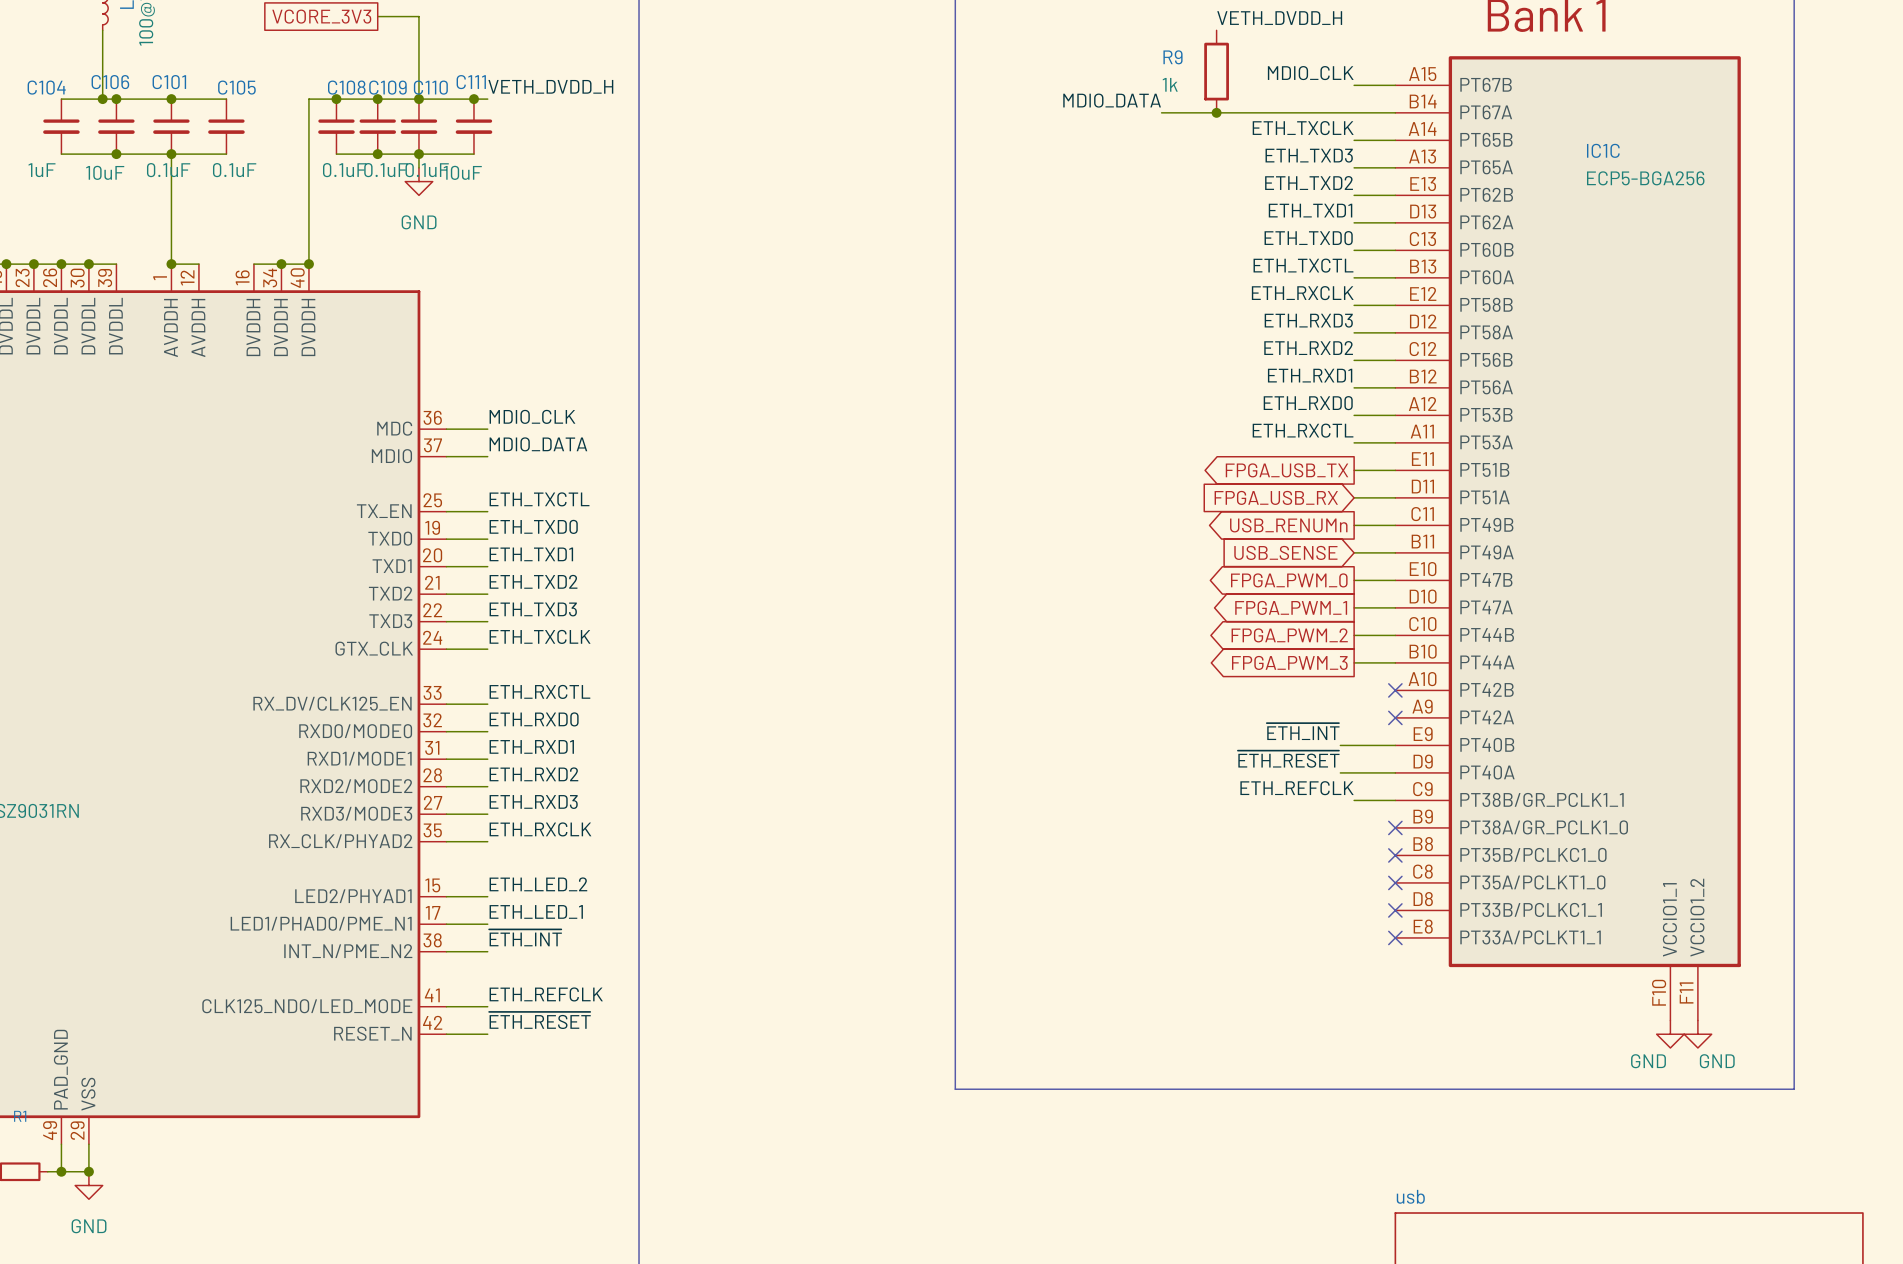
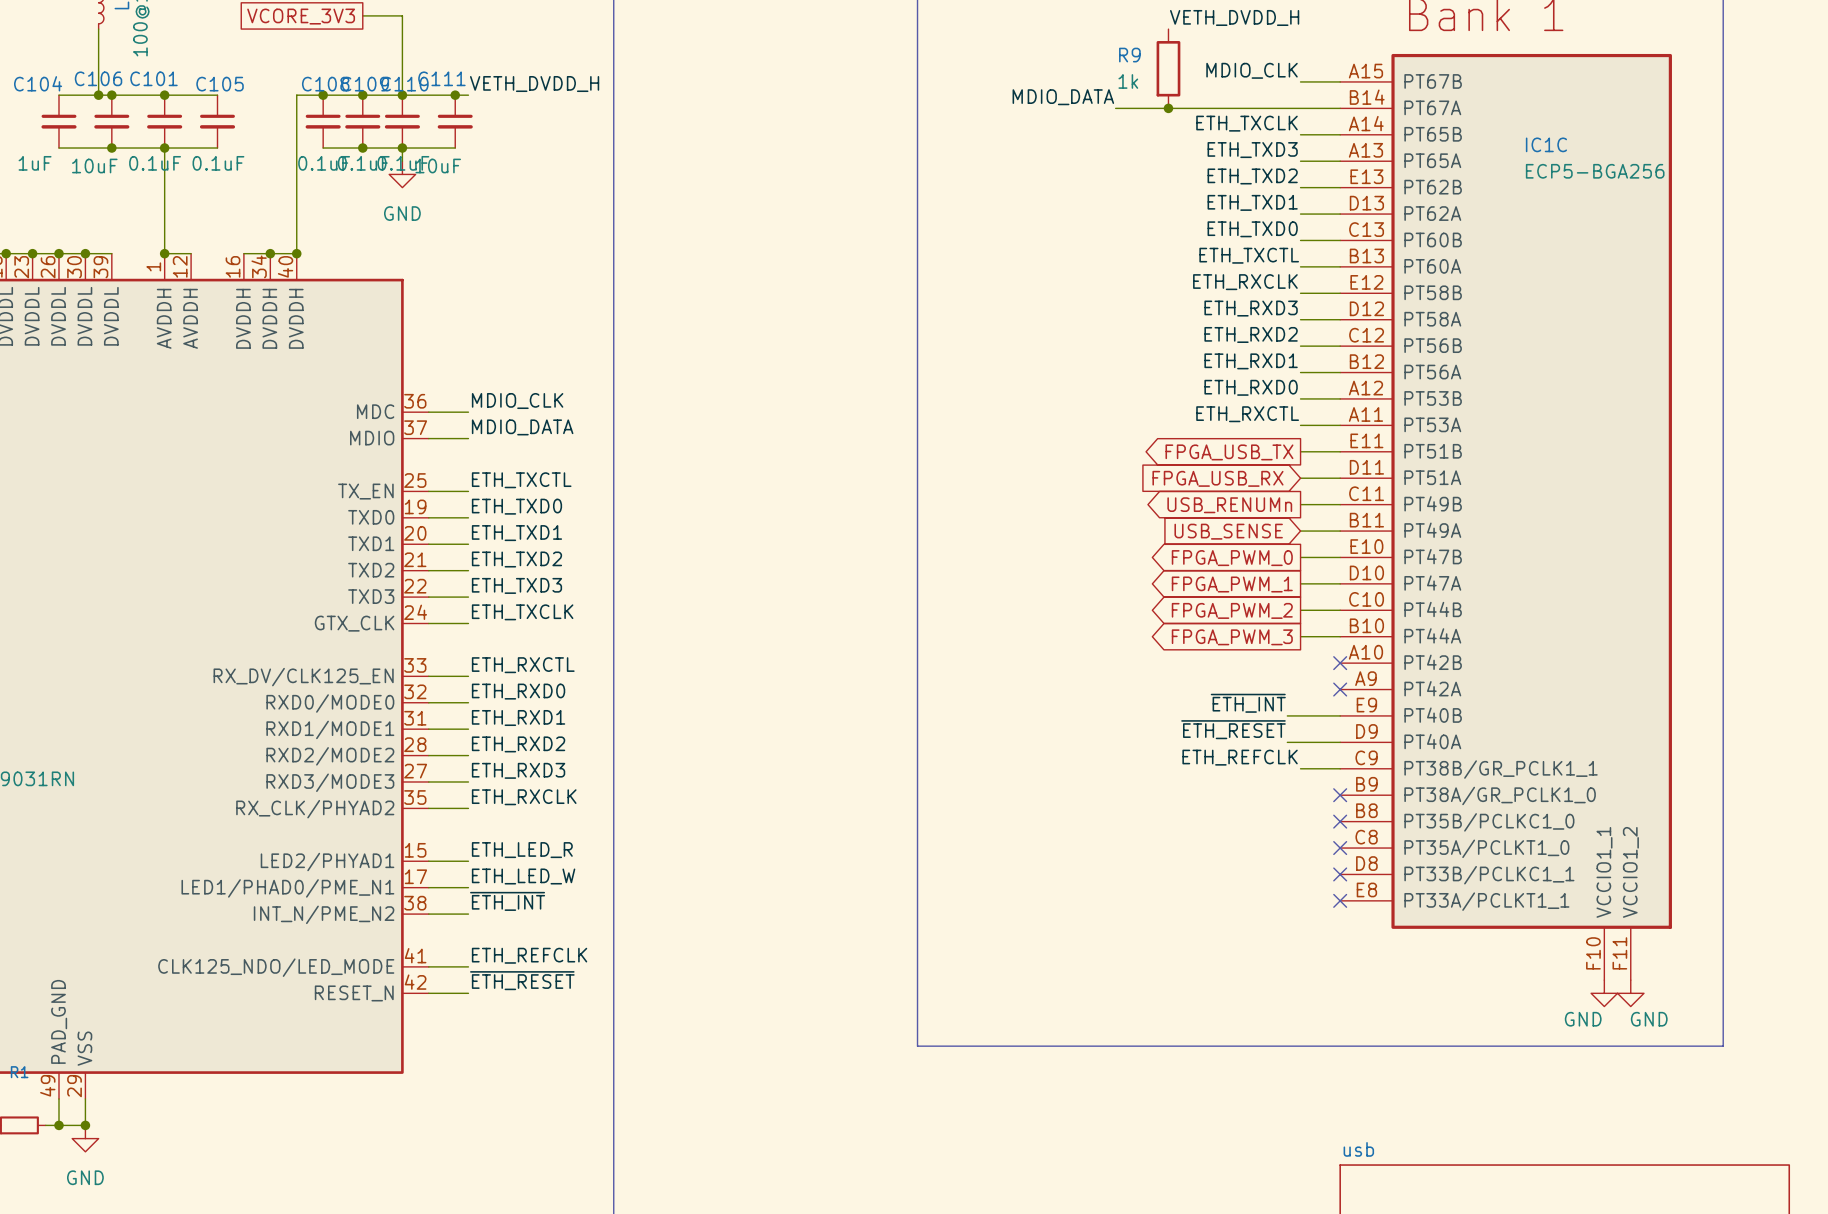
label: ETH_LED_2 (538, 884) -> ETH_LED_R (522, 850)
label: ETH_LED_1 (536, 911) -> ETH_LED_W (523, 876)

